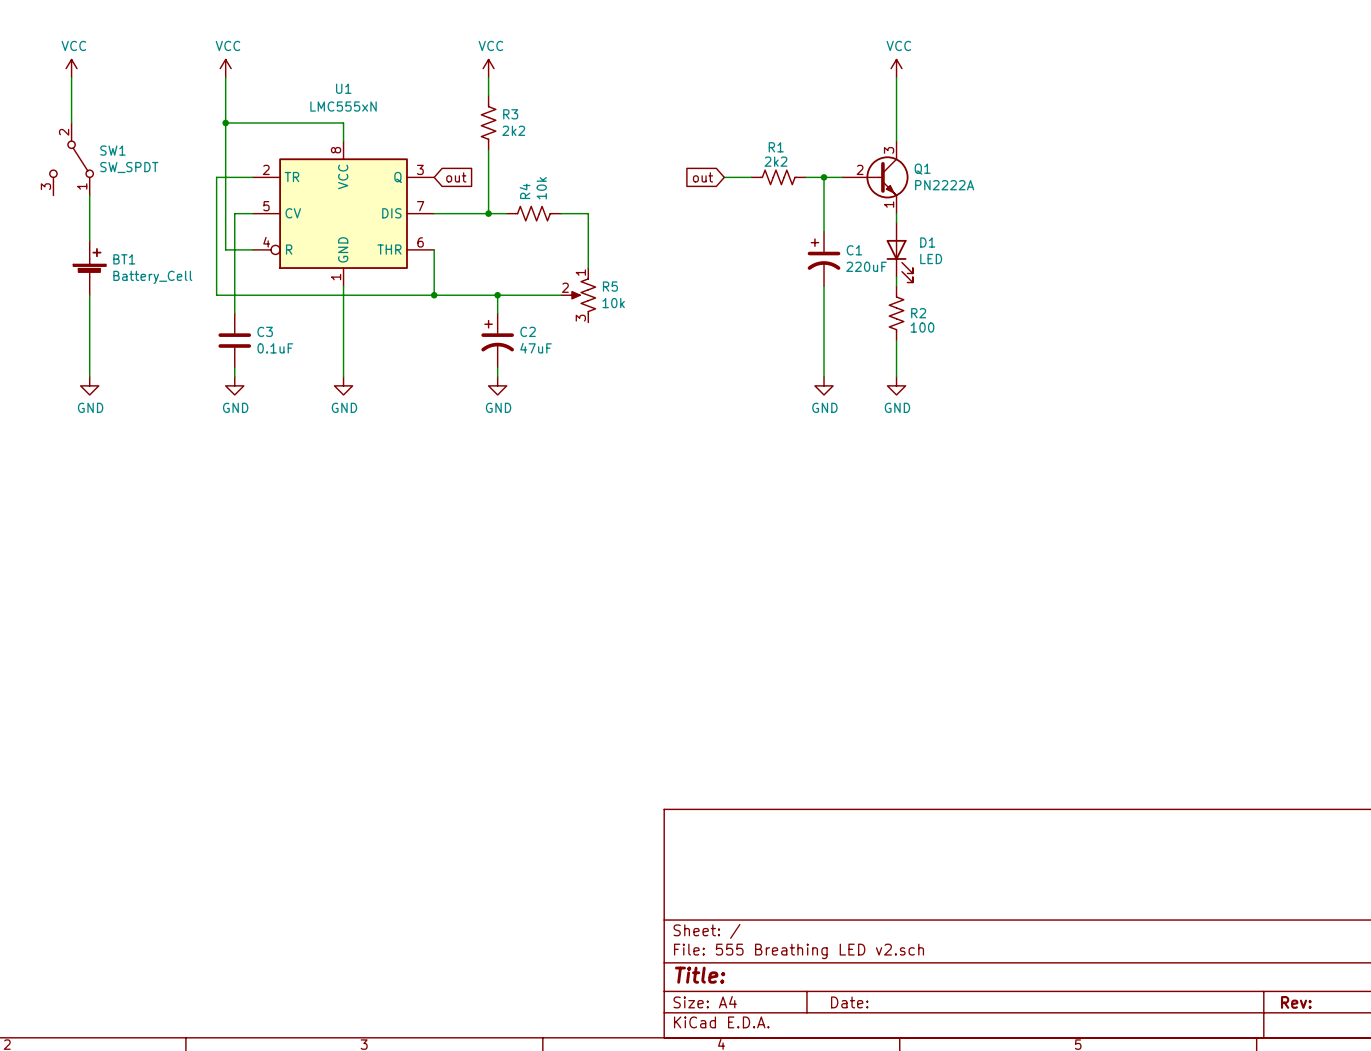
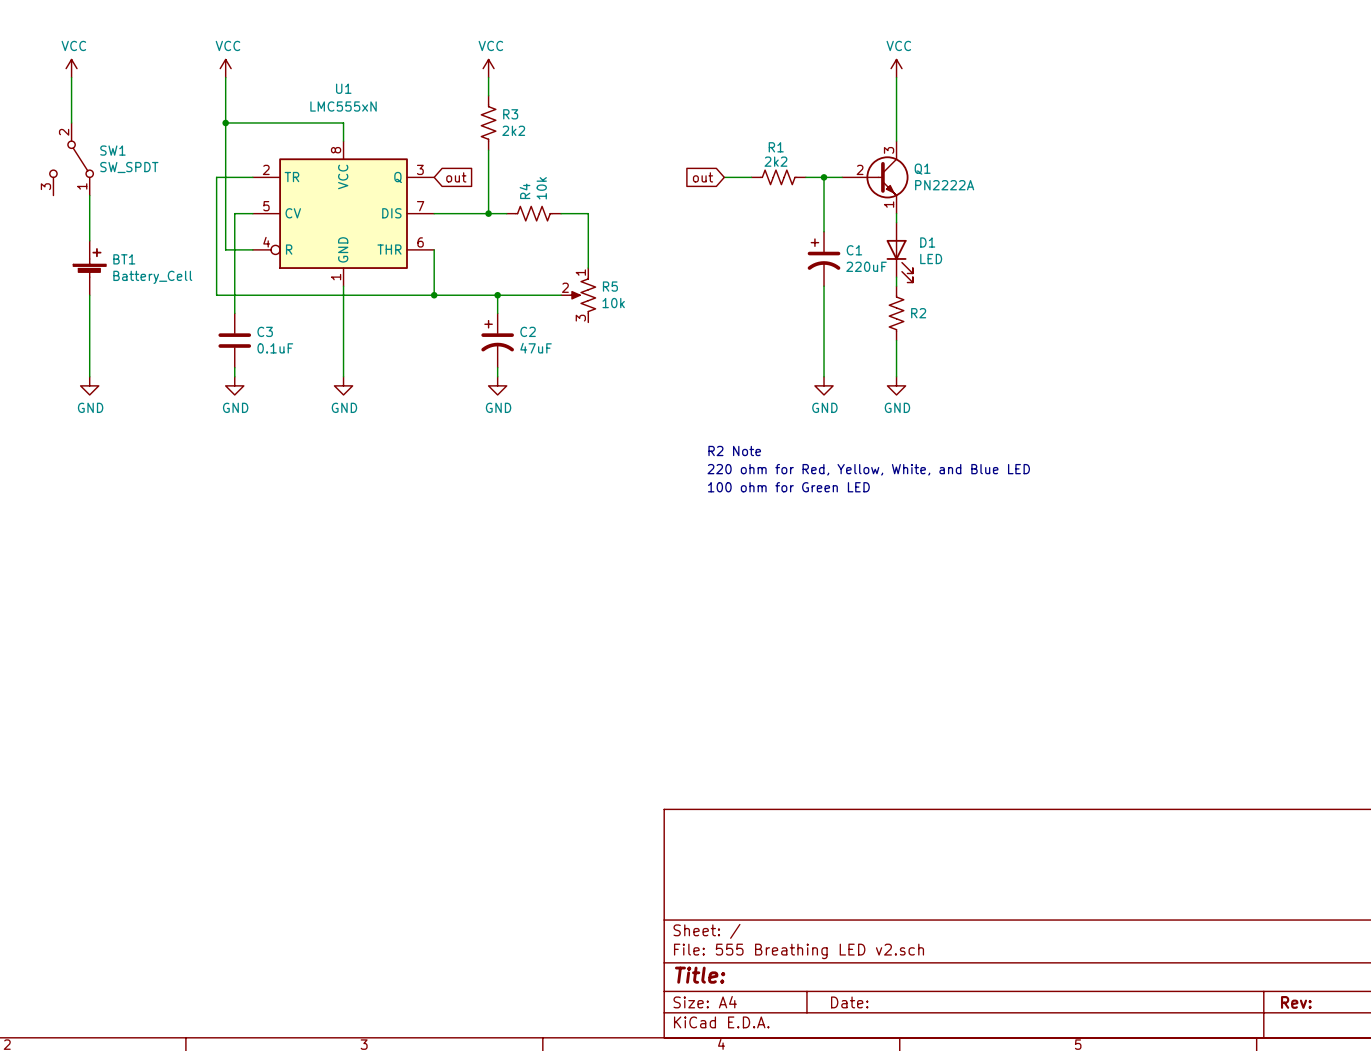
R2 value: 100 (922, 327) -> none
text: none -> R2 Note (734, 450)
text: none -> 220 ohm for Red, Yellow, White, and Blue LED (868, 469)
text: none -> 100 ohm for Green LED (788, 487)

